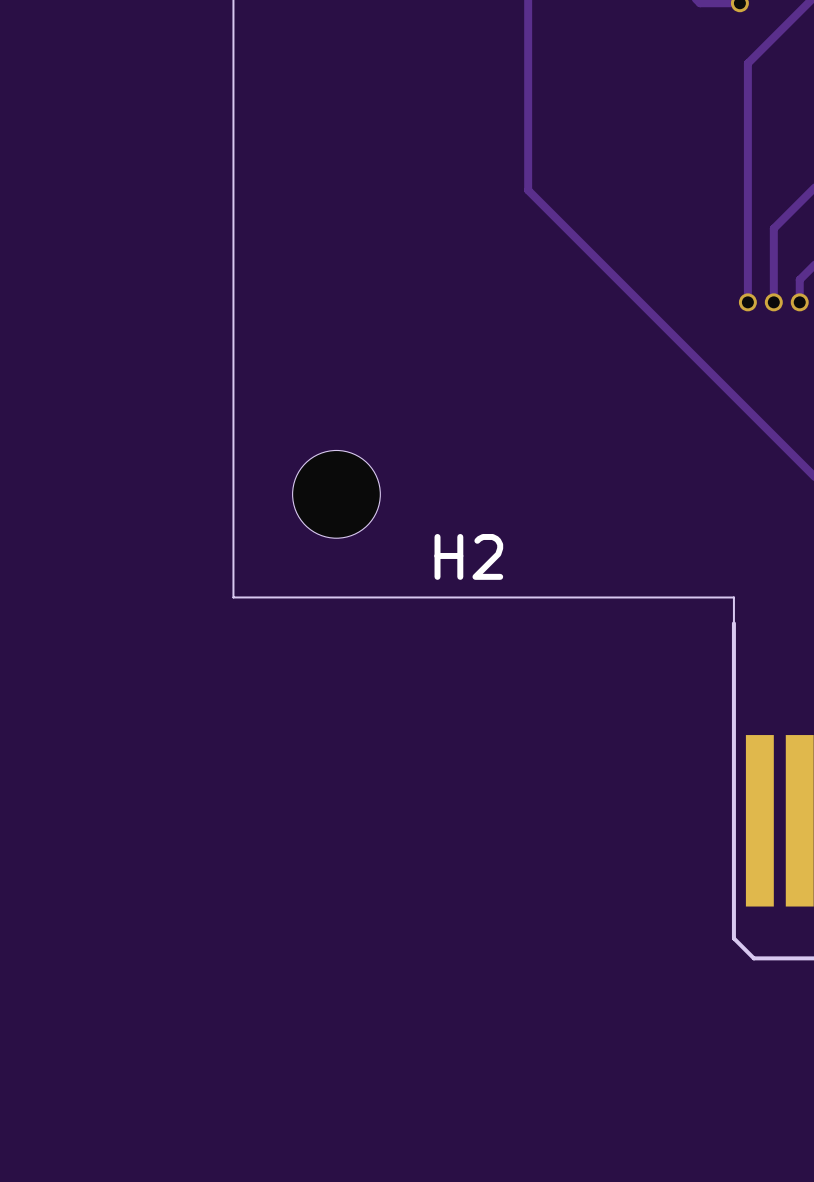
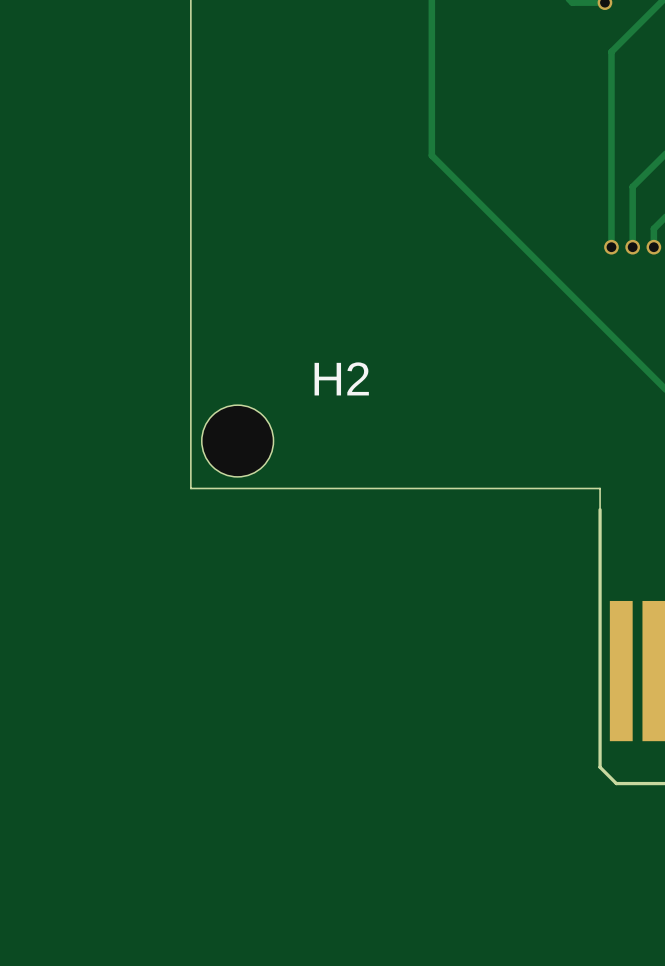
H2 position: (336, 494) -> (237, 441)
H2 name position: H2 (468, 556) -> H2 (341, 378)

